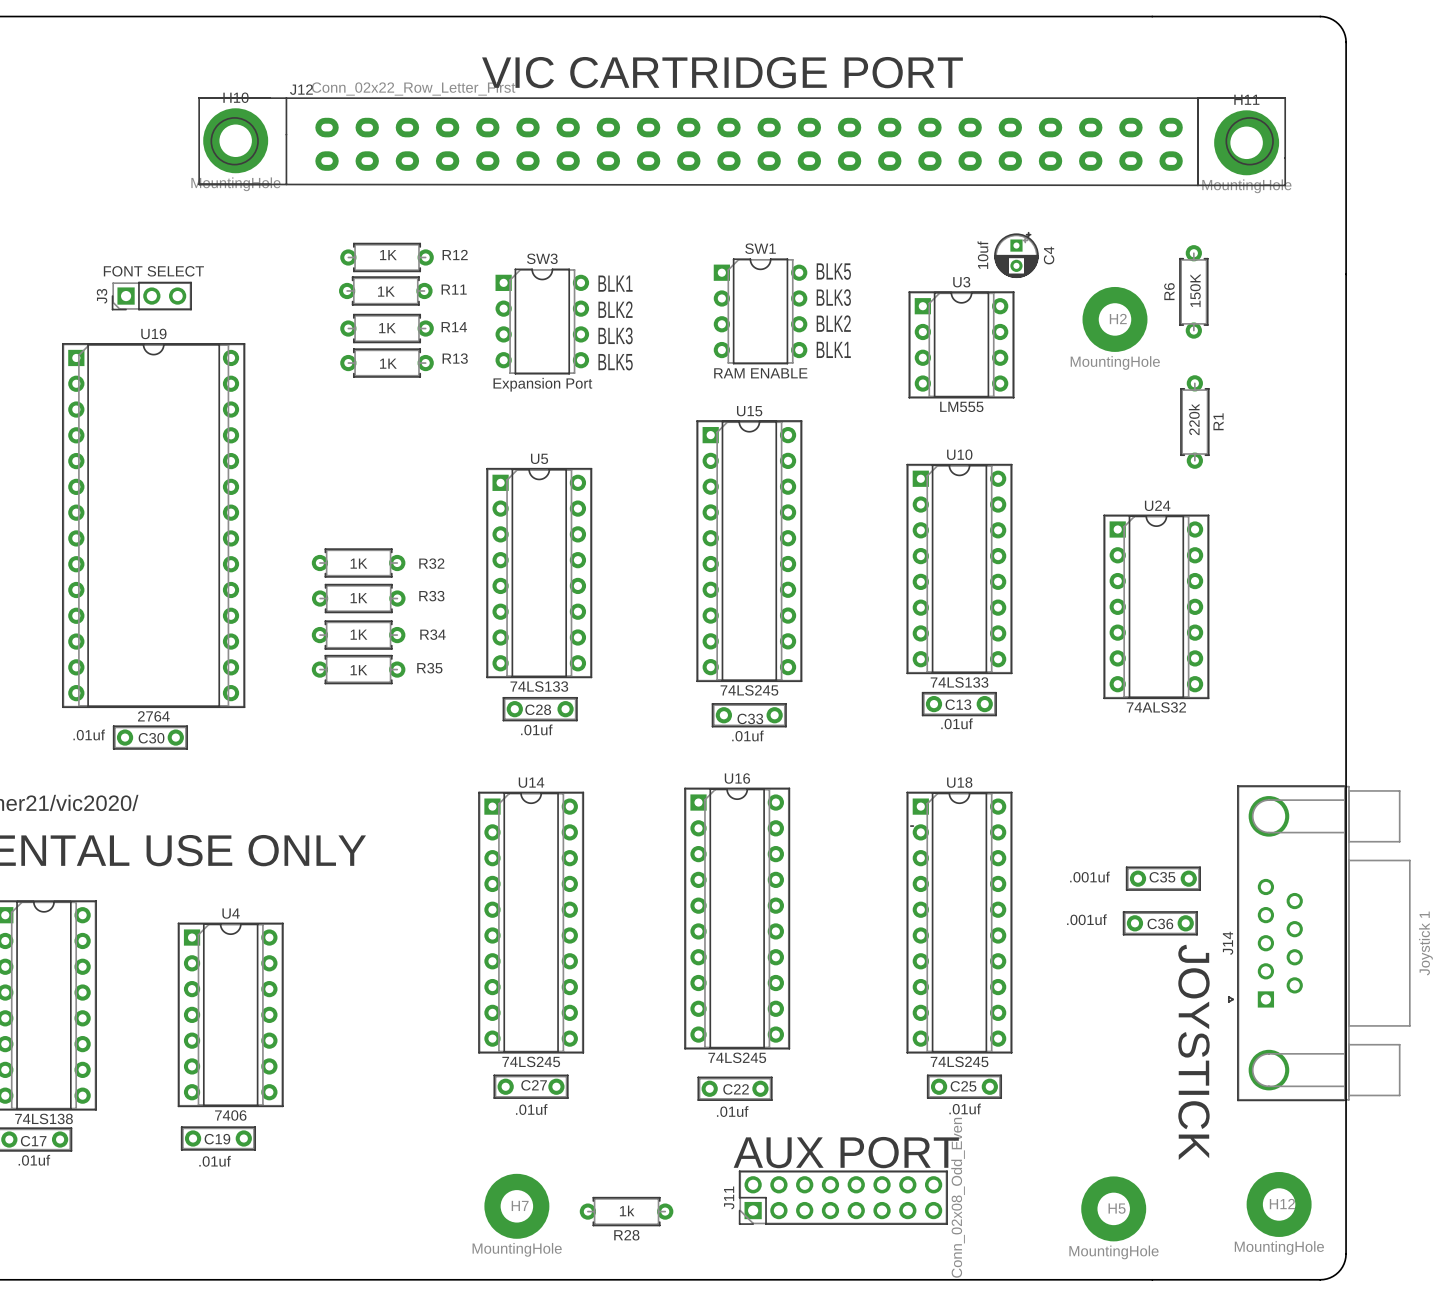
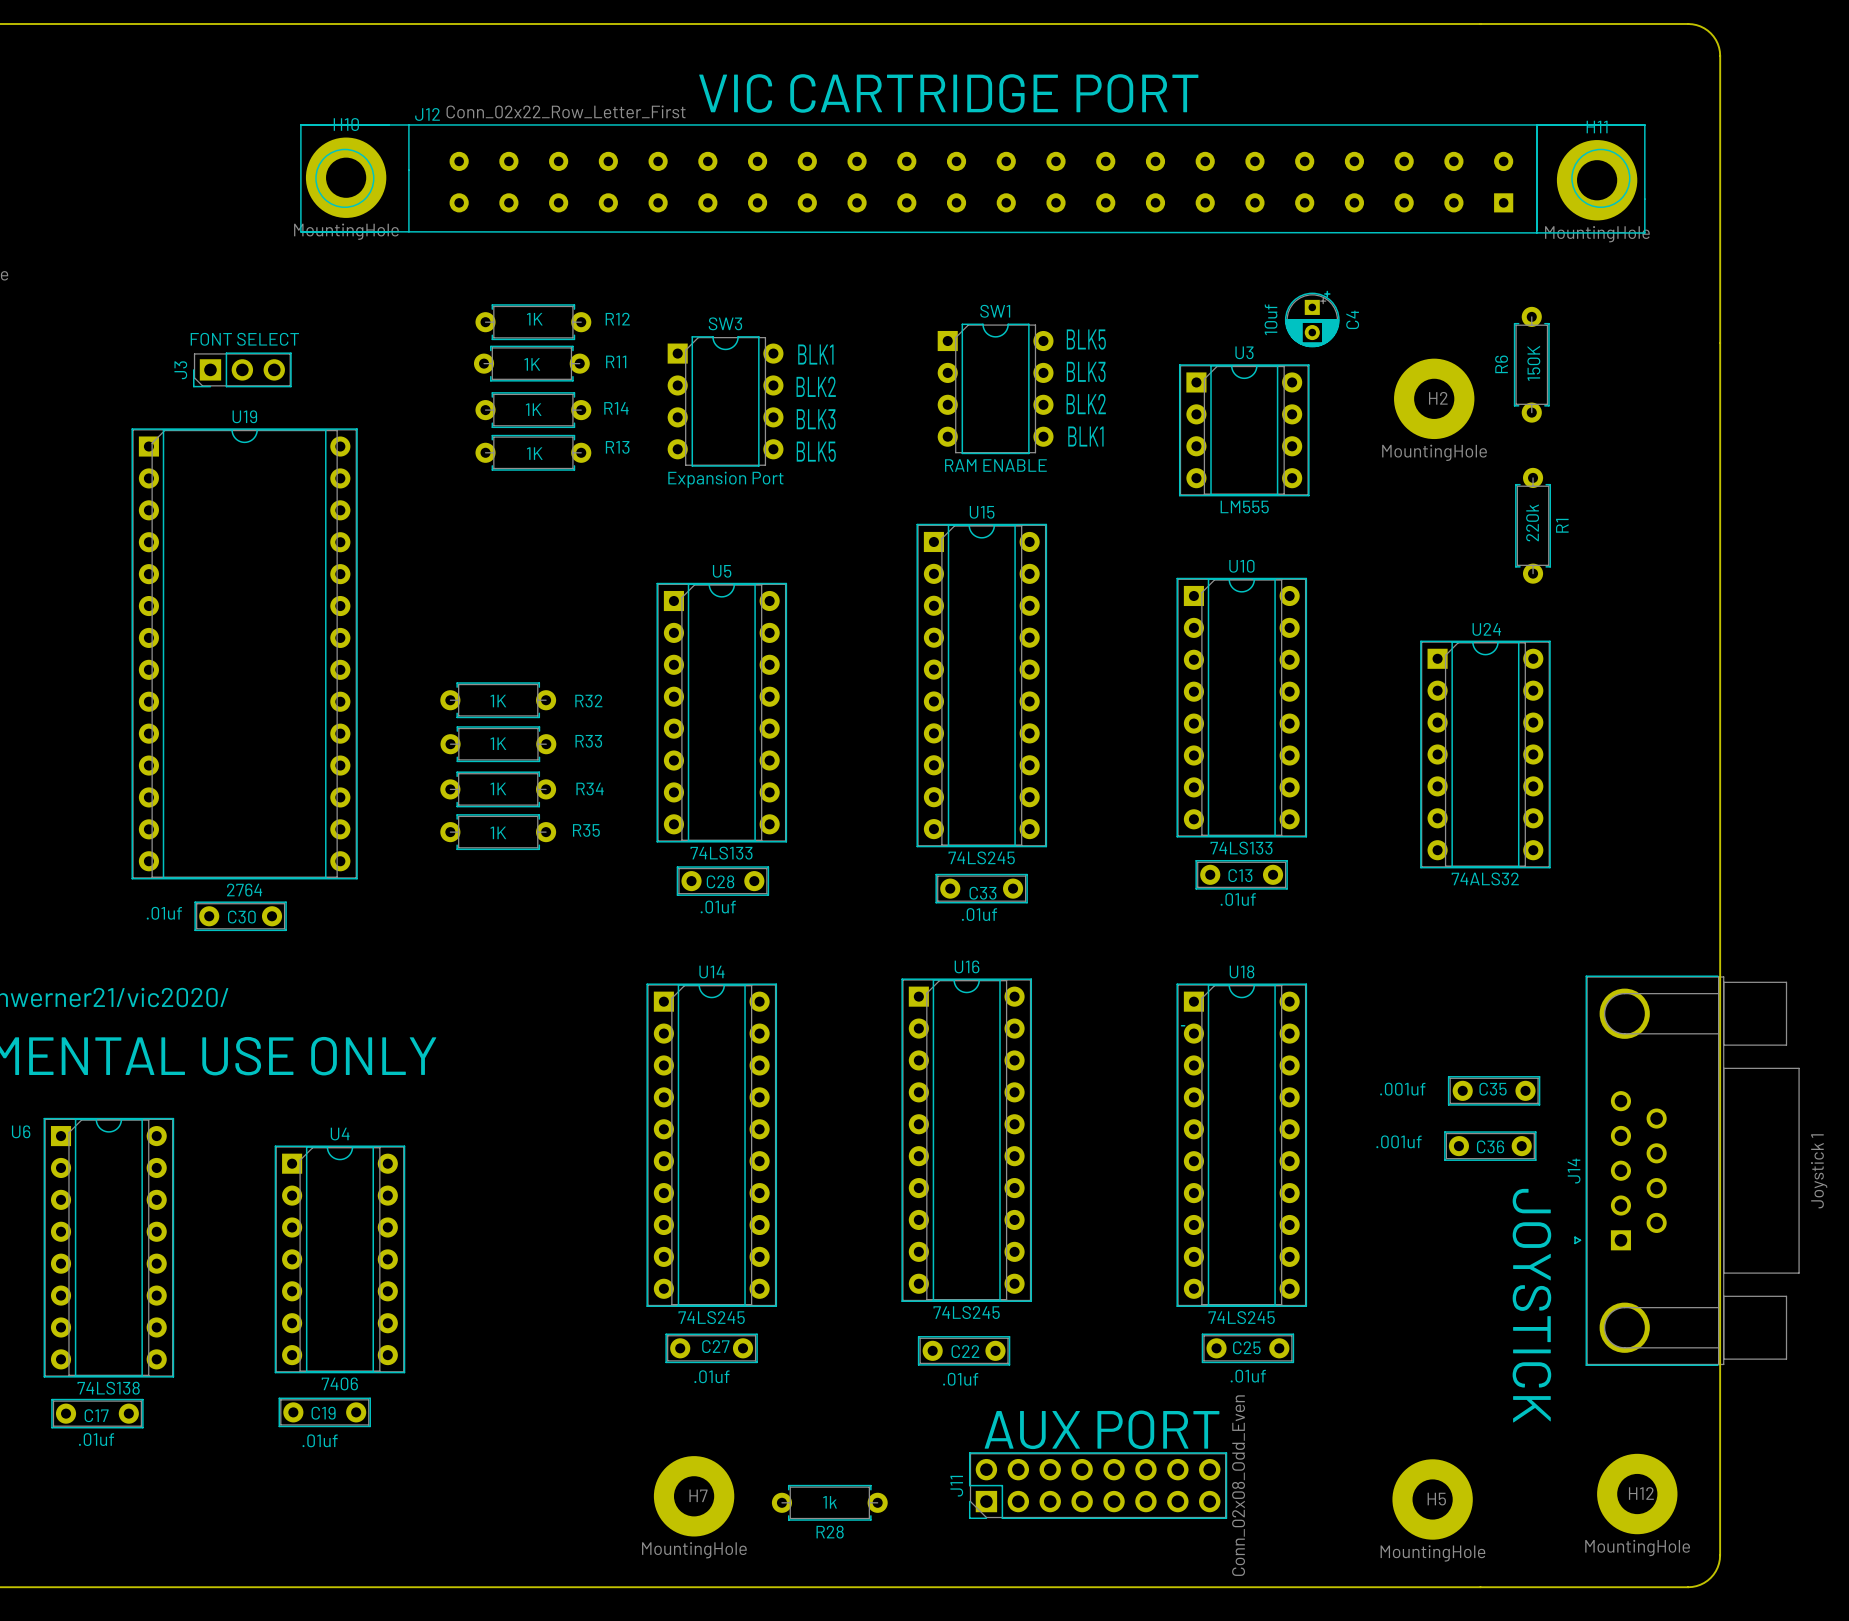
J12 footprint: [198, 97, 1286, 187] -> [300, 124, 1646, 234]

